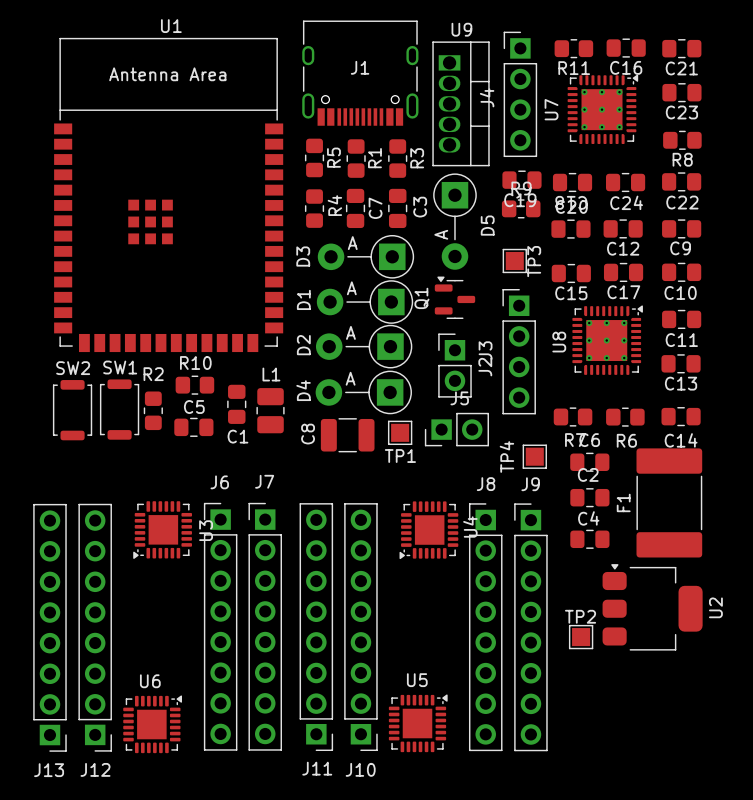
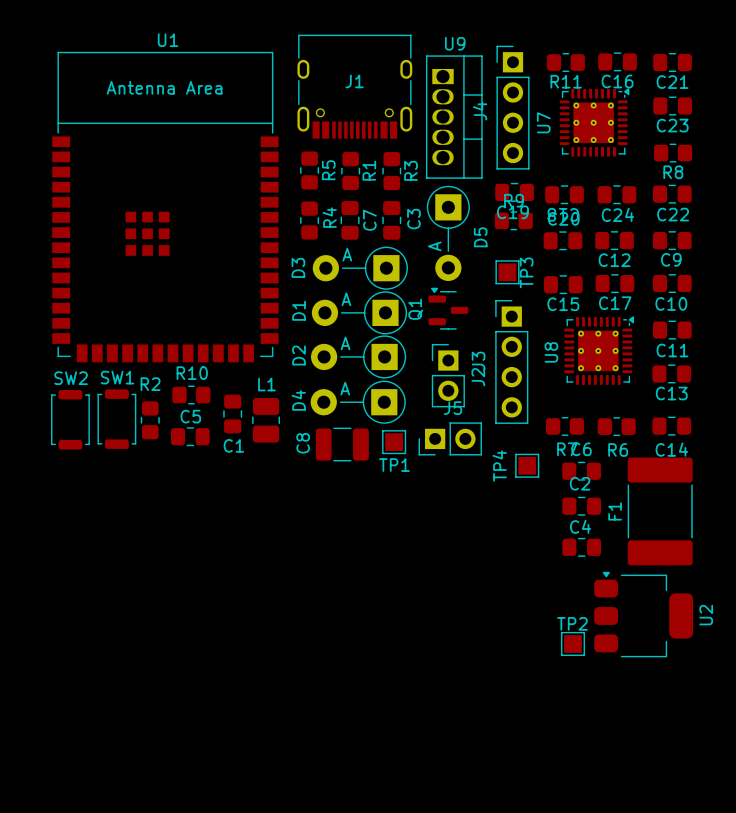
U3: (162, 530) -> none
U4: (428, 530) -> none
J6: (220, 626) -> none
J7: (265, 626) -> none
J13: (49, 627) -> none
J12: (95, 627) -> none
J11: (316, 627) -> none
J10: (360, 627) -> none
J8: (485, 627) -> none
J9: (530, 627) -> none
U5: (418, 723) -> none
U6: (152, 724) -> none

